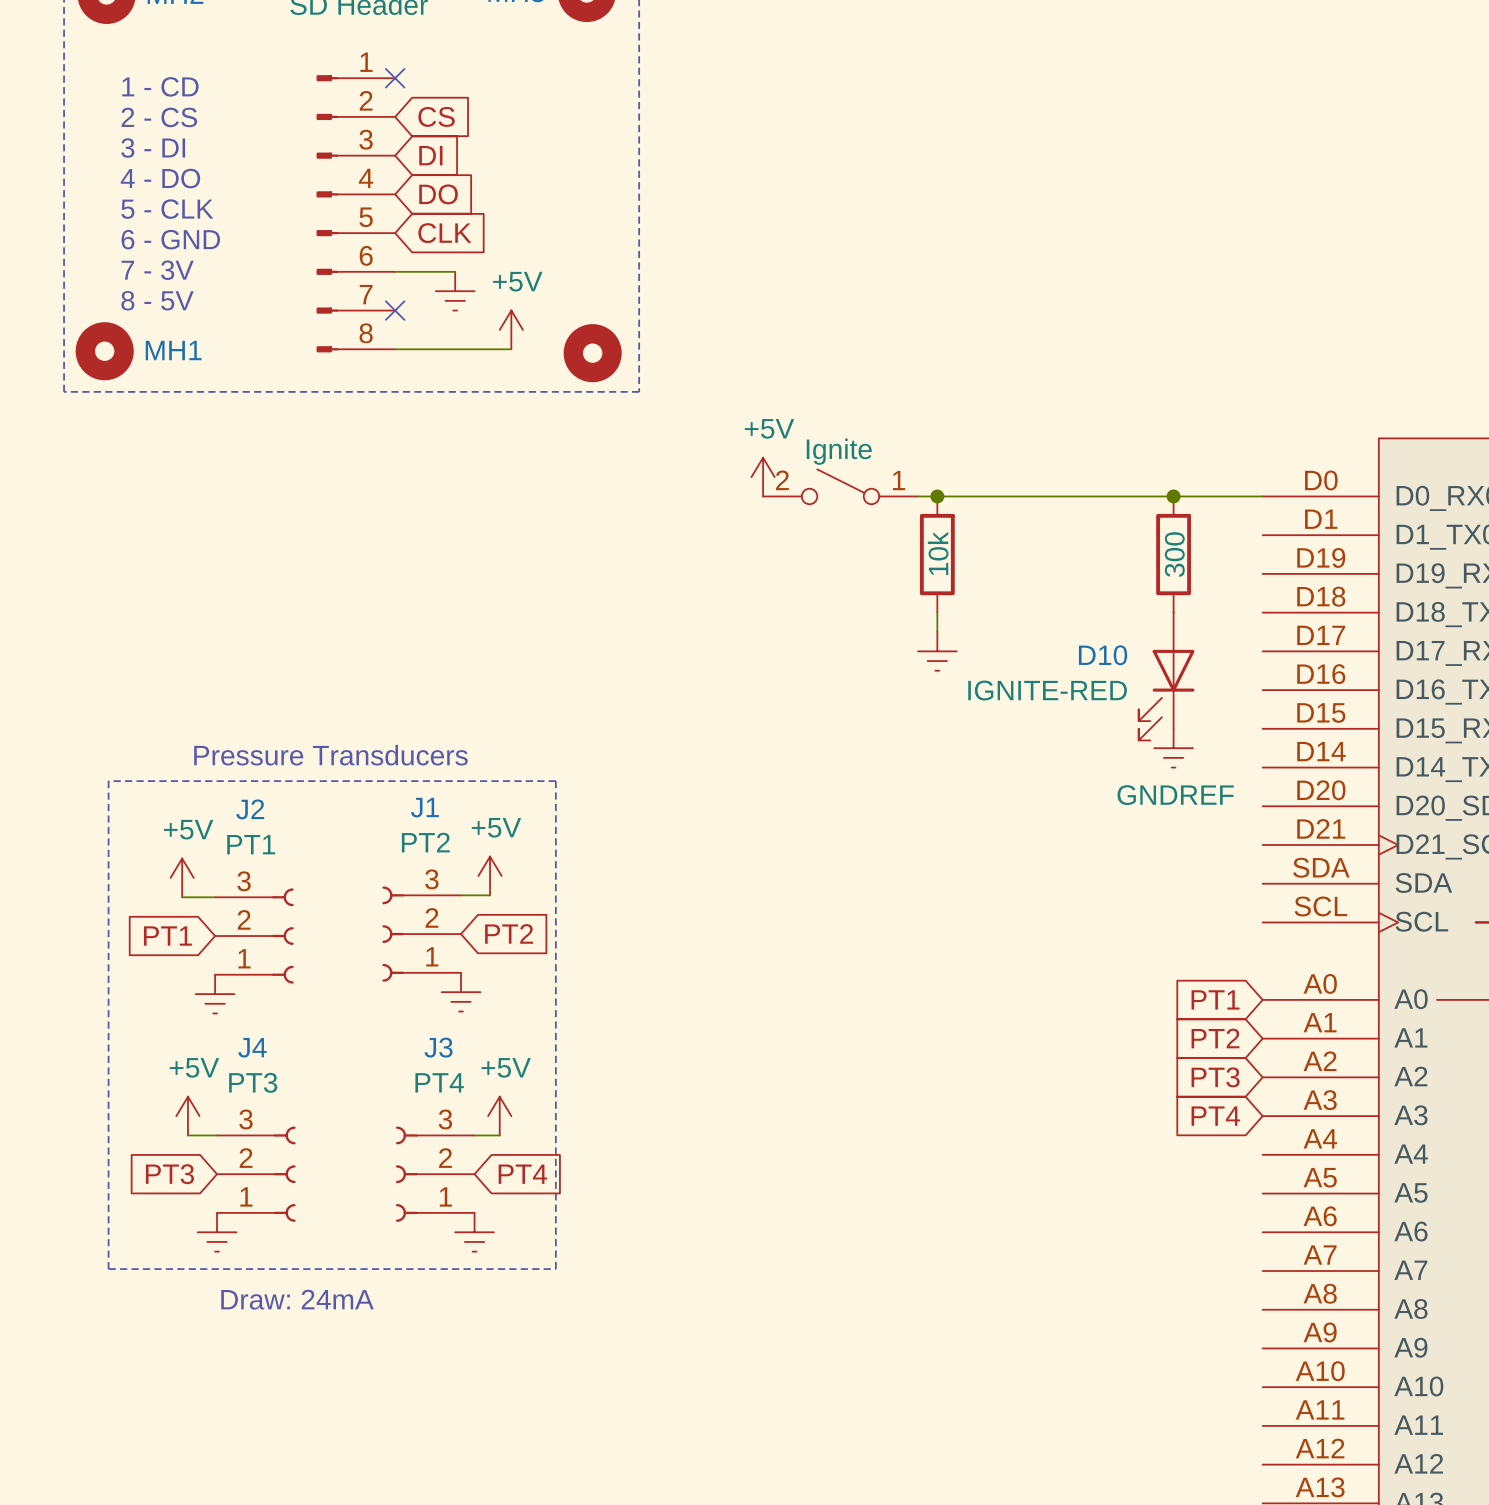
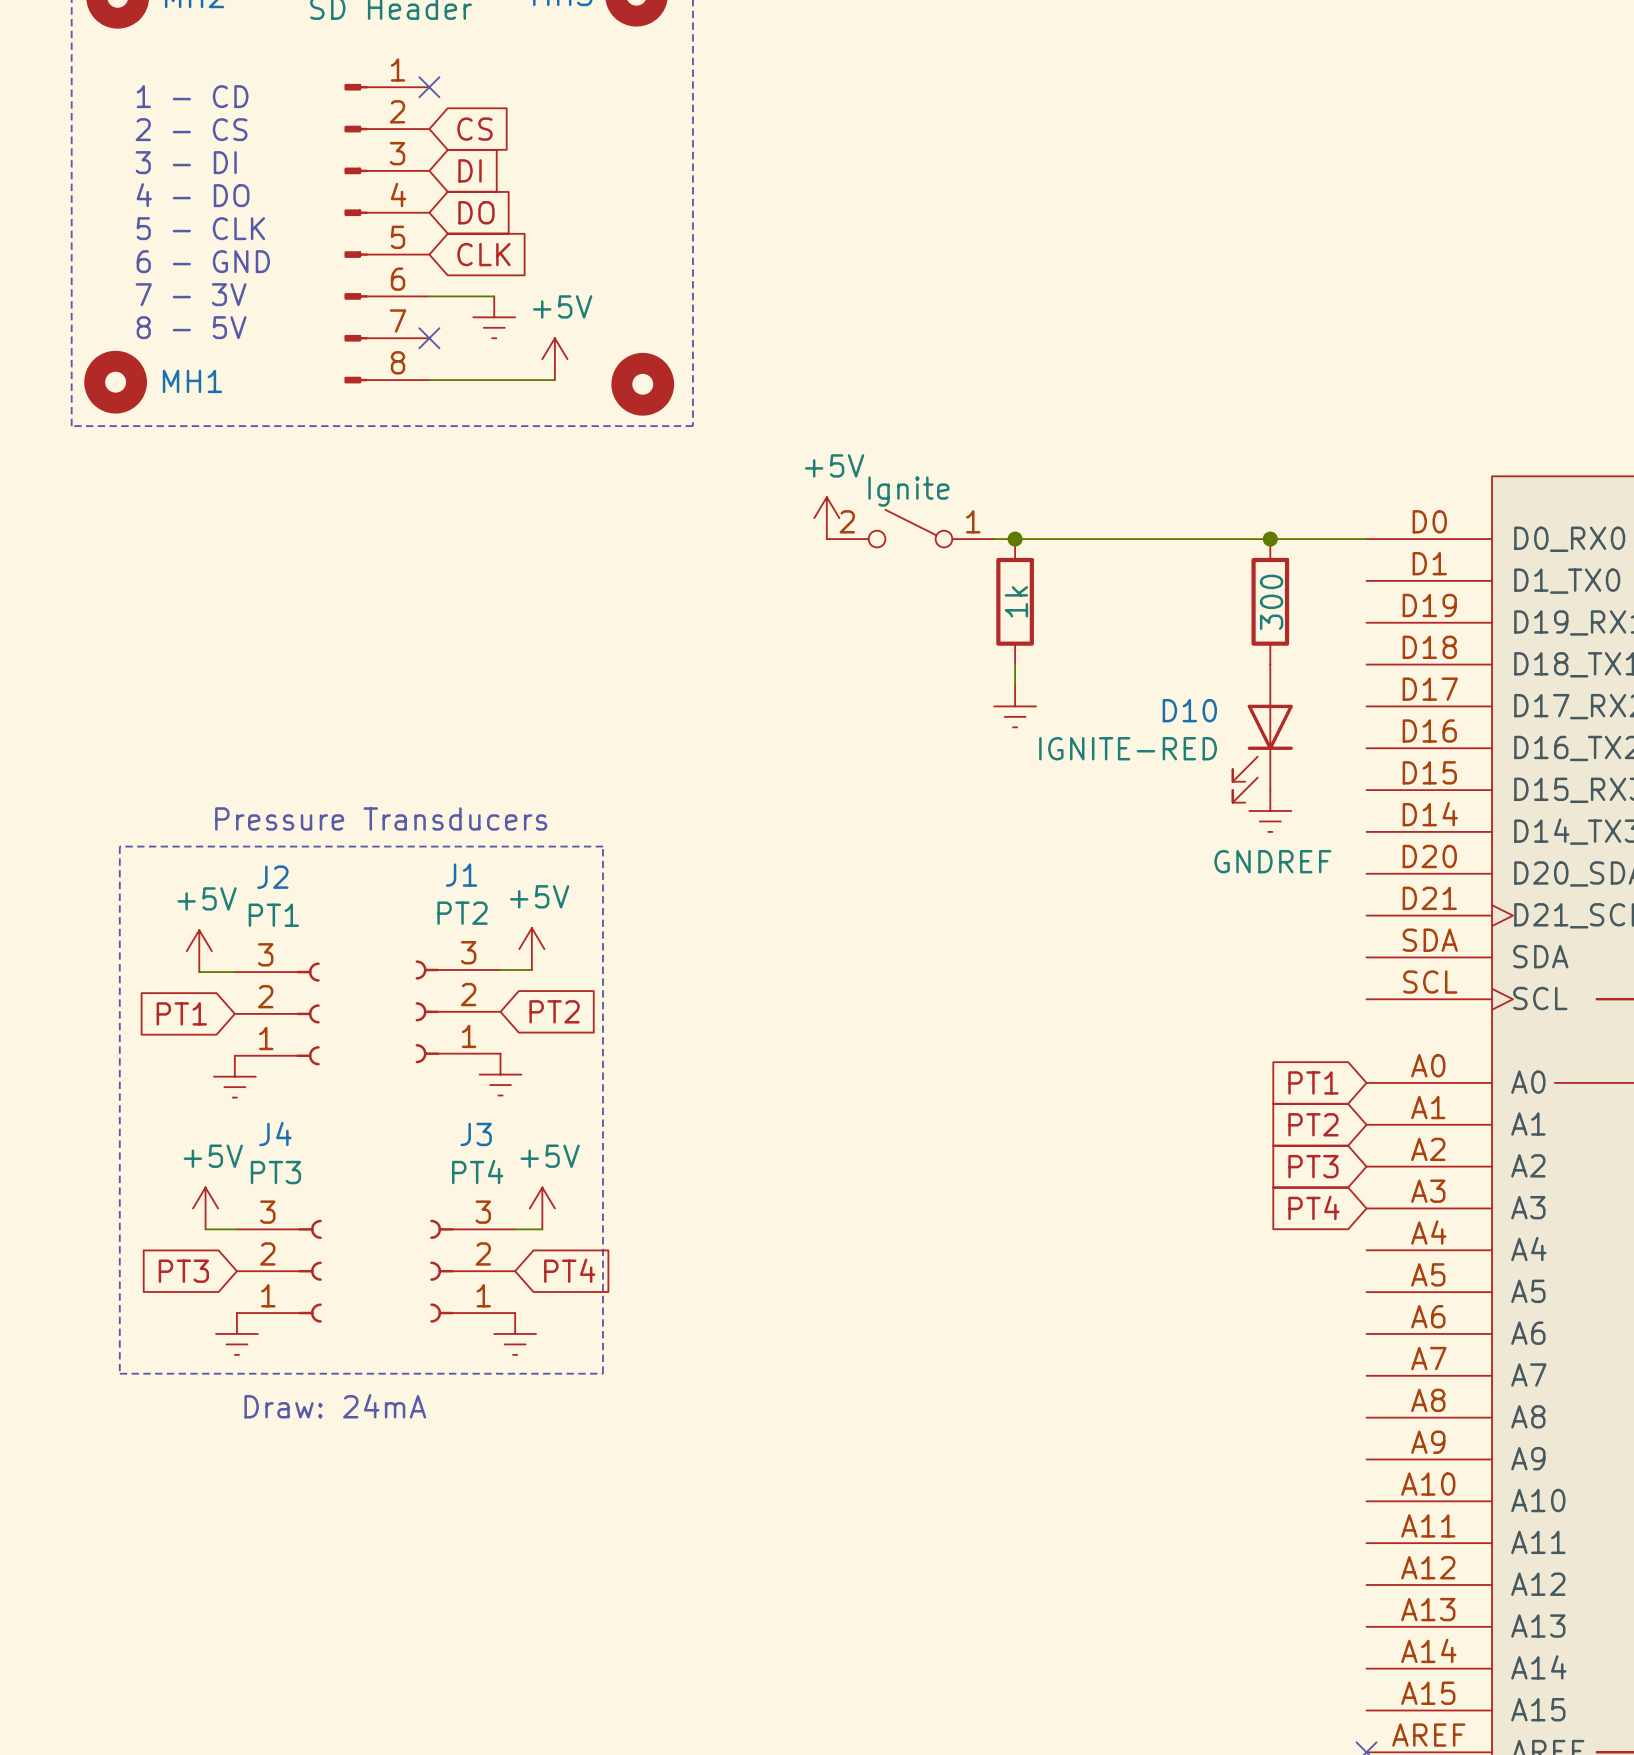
part value: 10k (938, 553) -> 1k (1016, 601)

